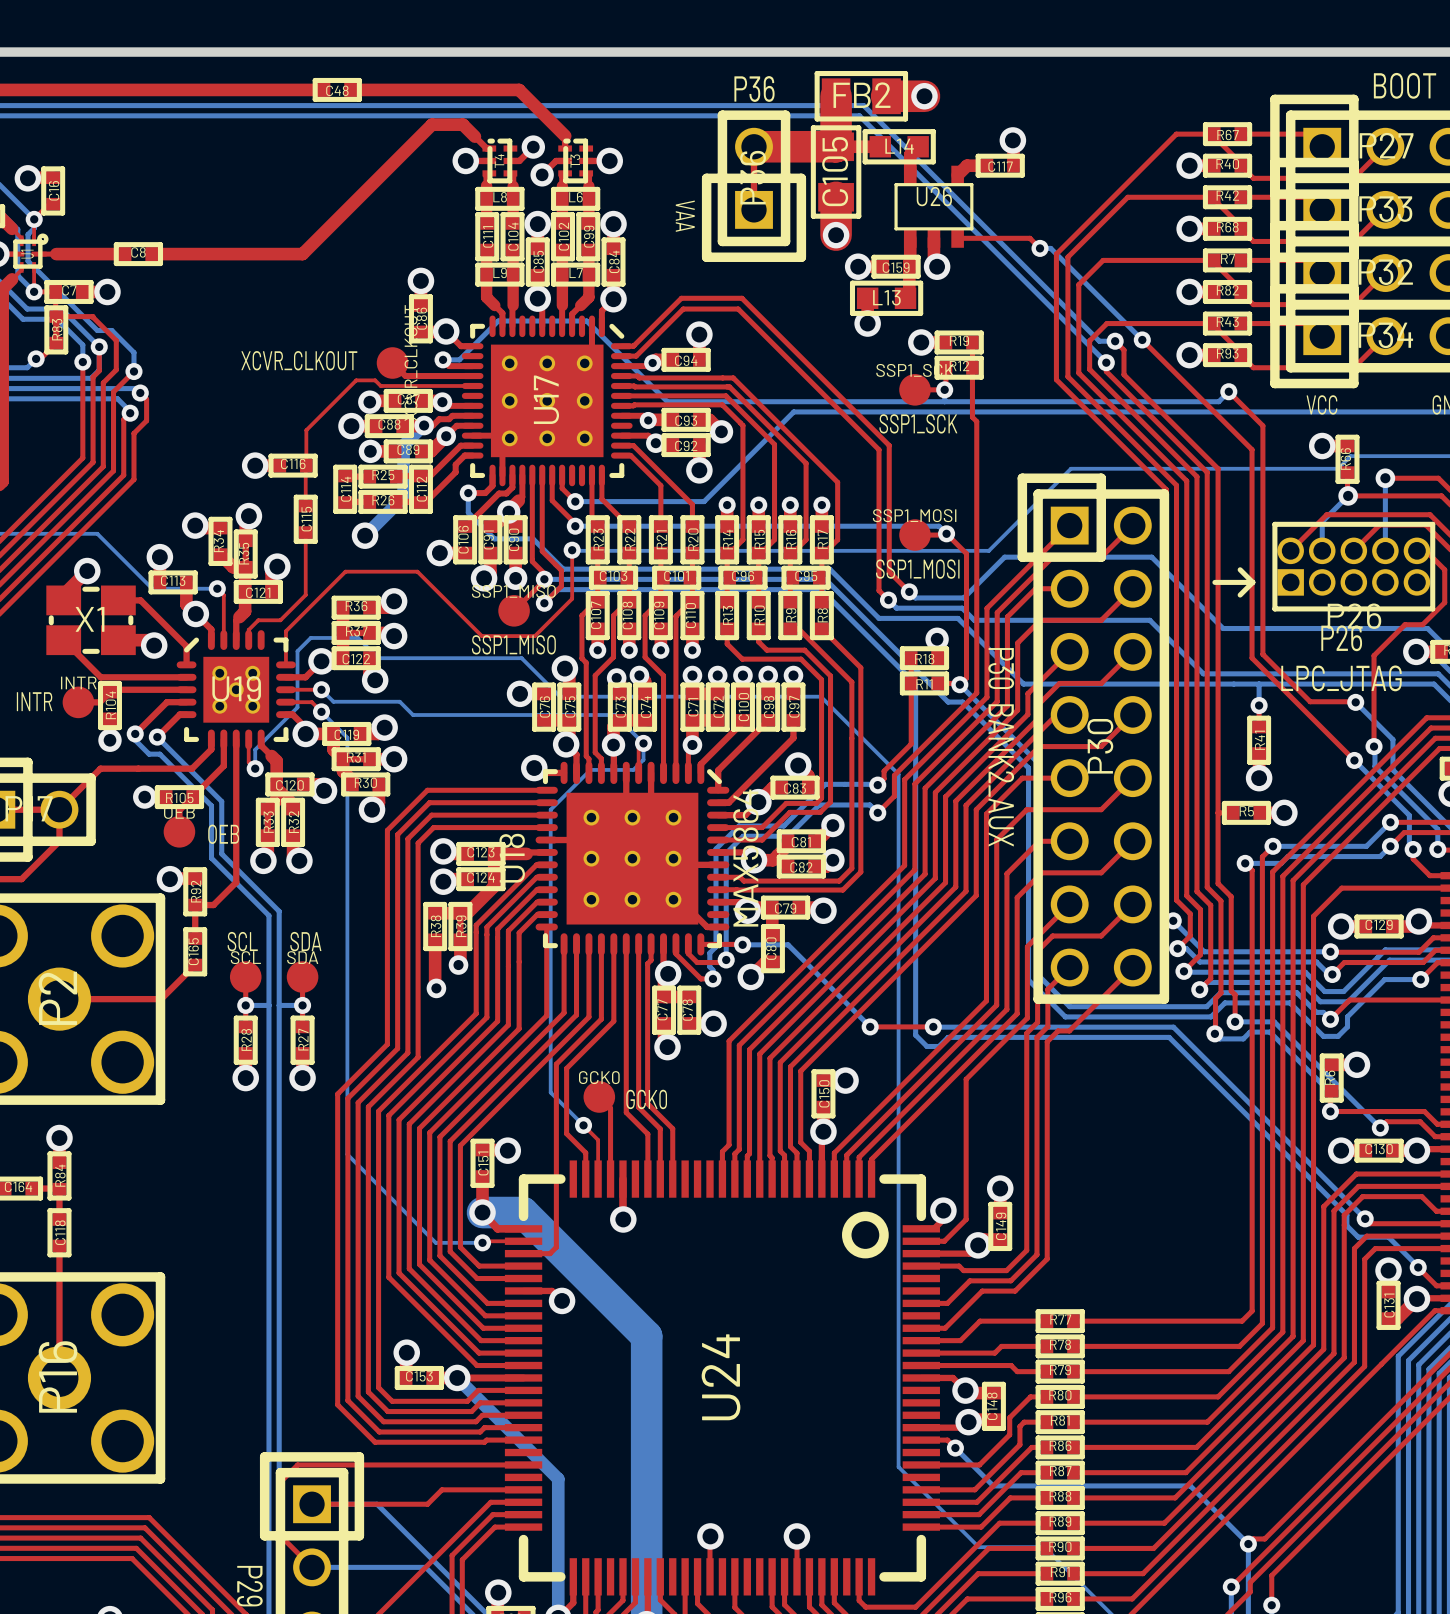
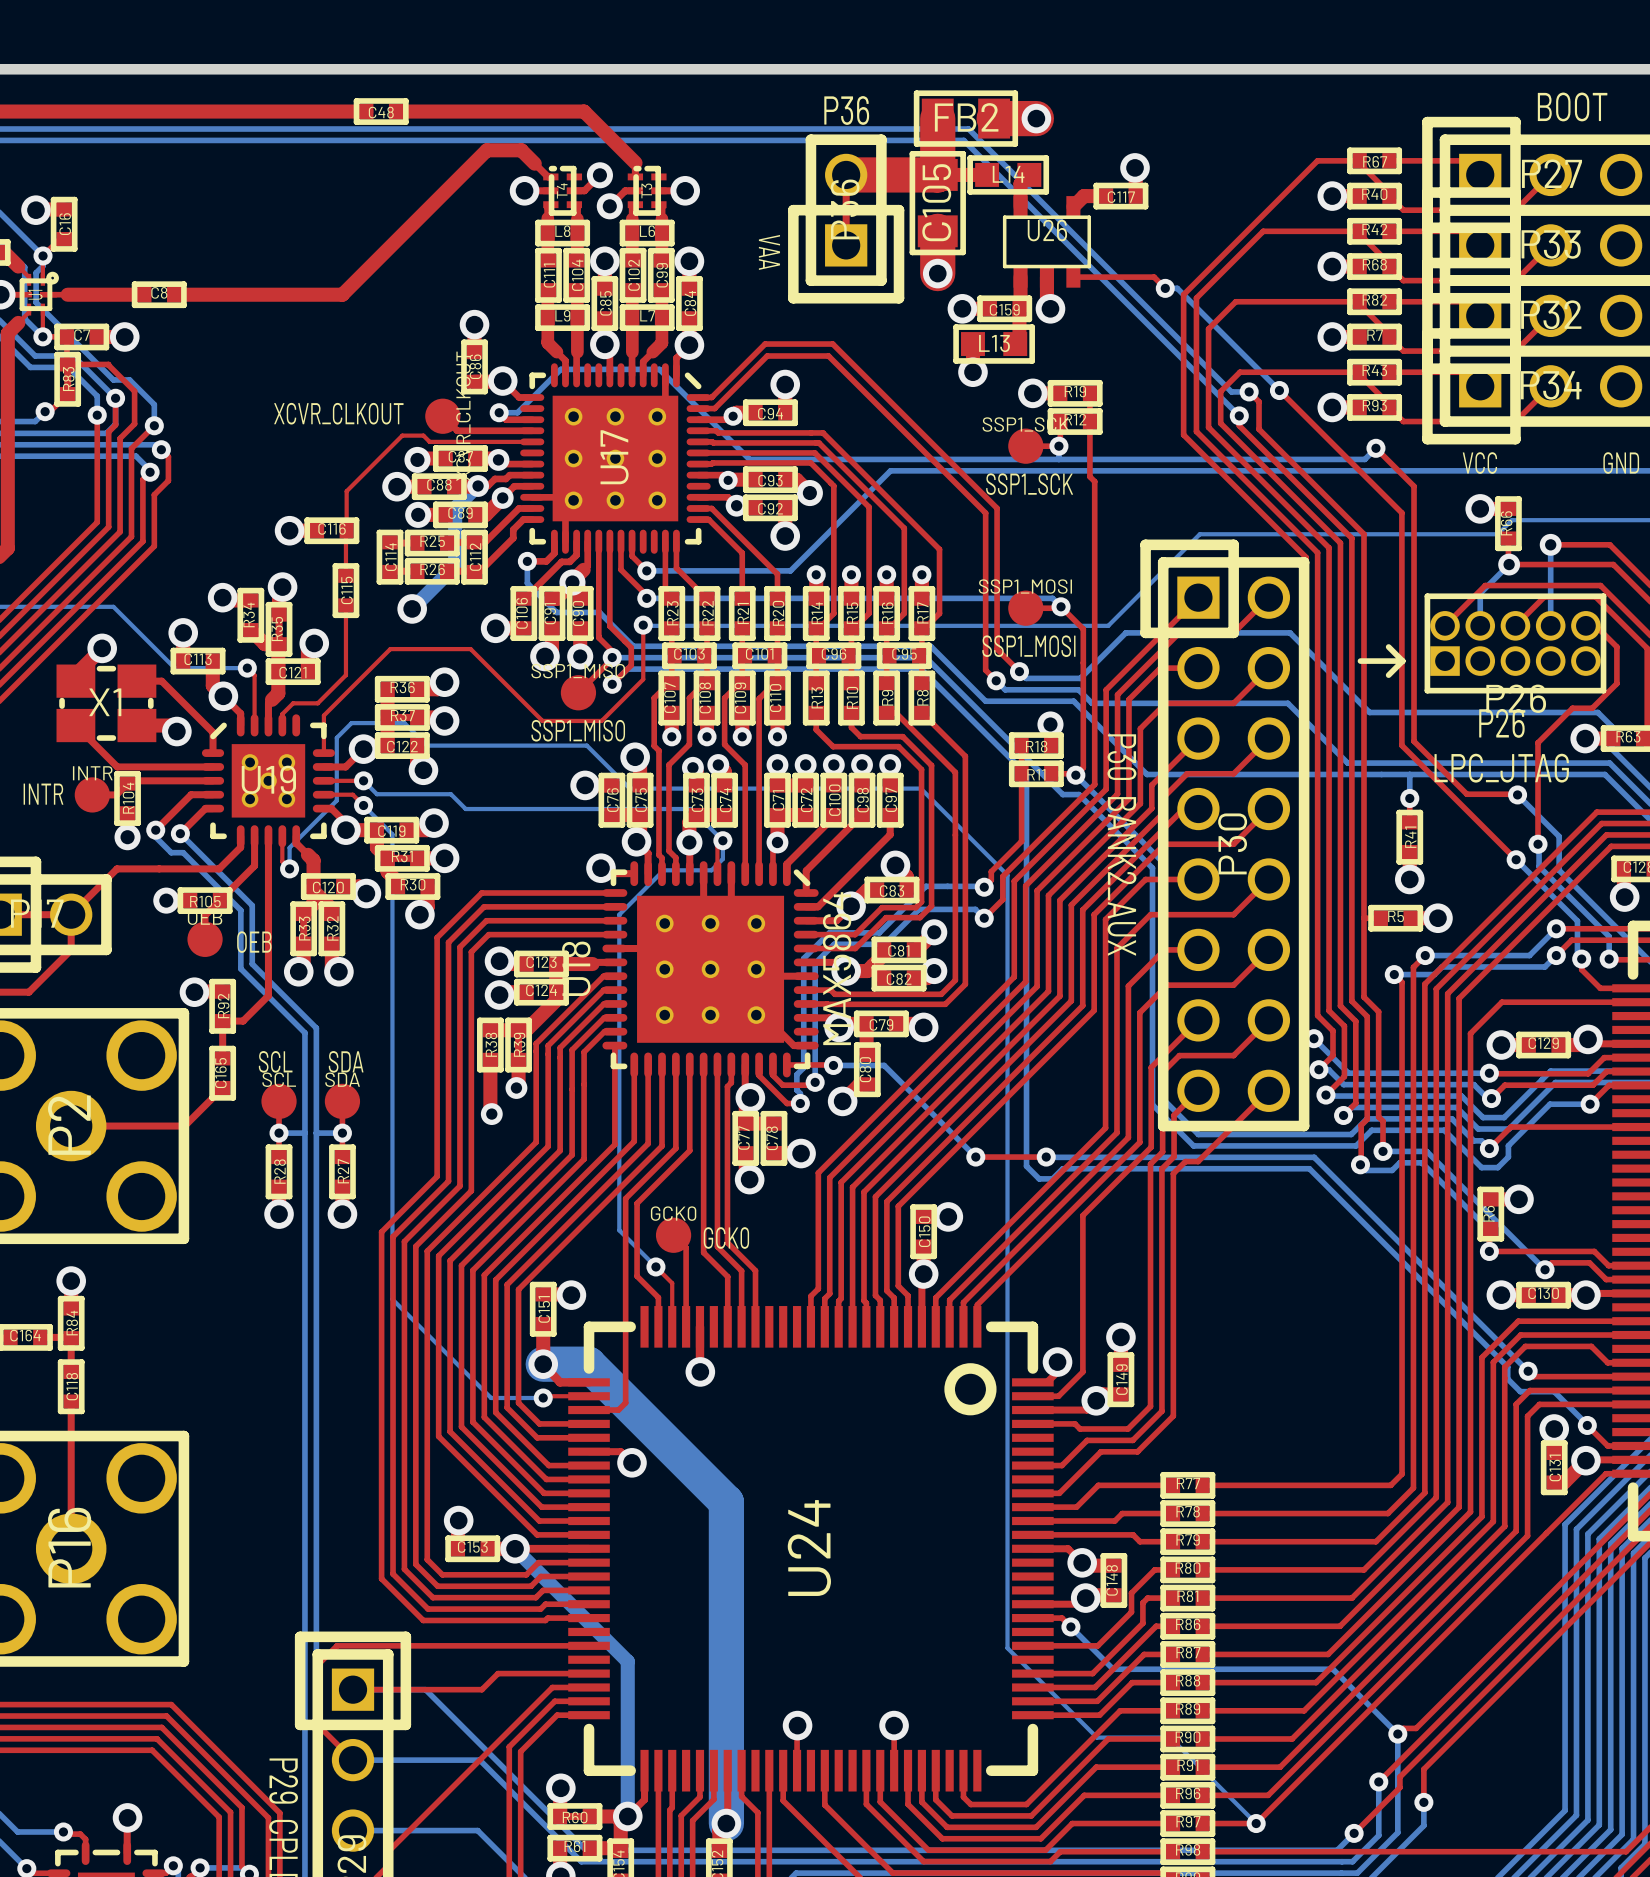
R7 name: R7 (1228, 258) -> R82 (1374, 299)
R82 name: R82 (1227, 290) -> R7 (1375, 335)

